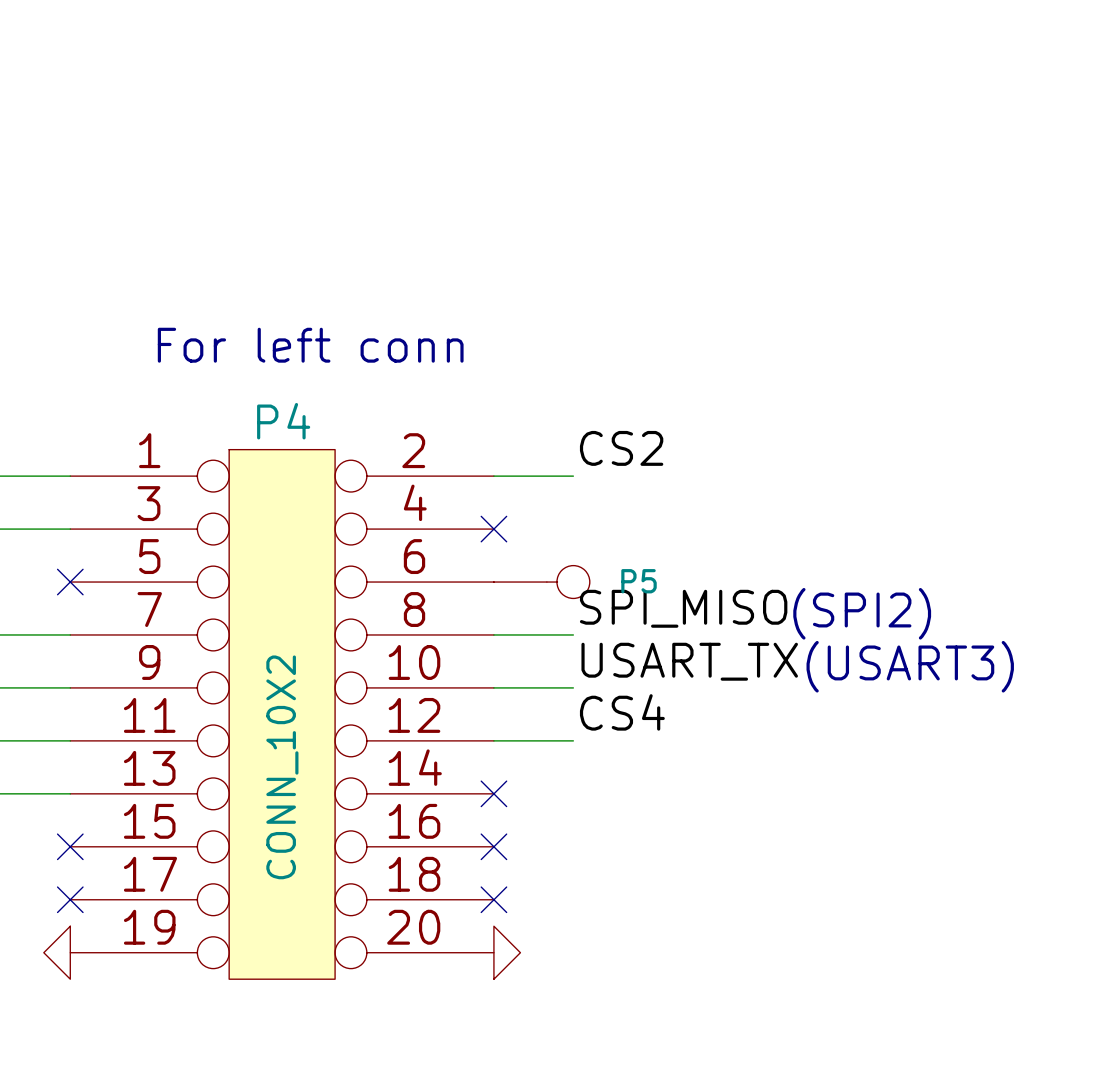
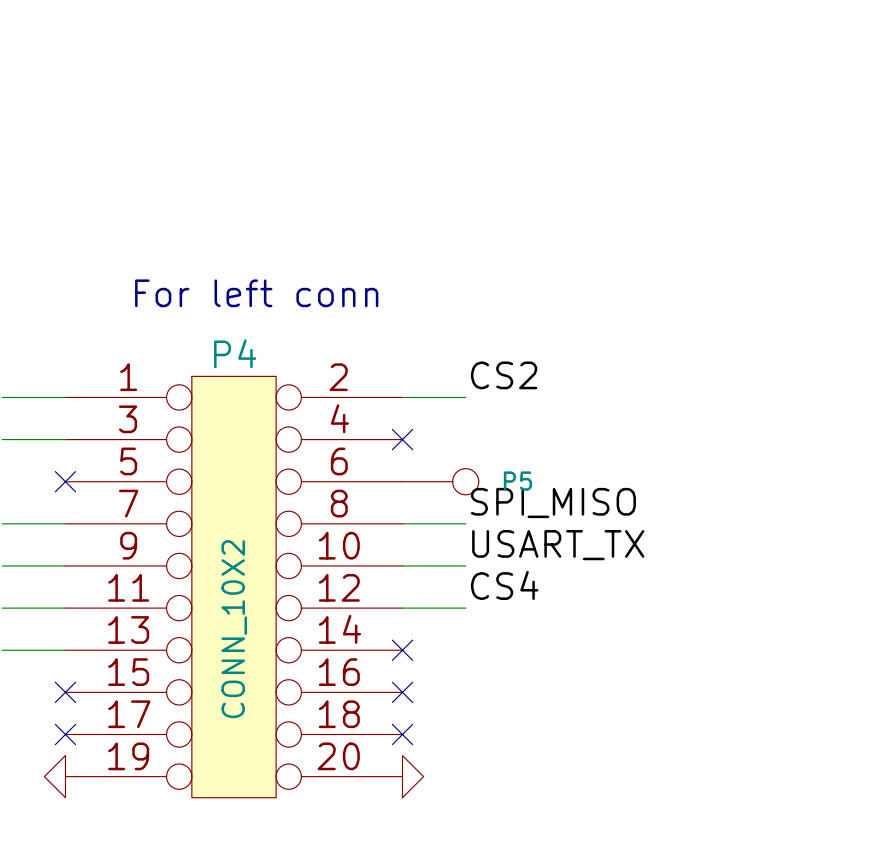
text: (SPI2) (862, 613) -> none
text: (USART3) (910, 666) -> none

